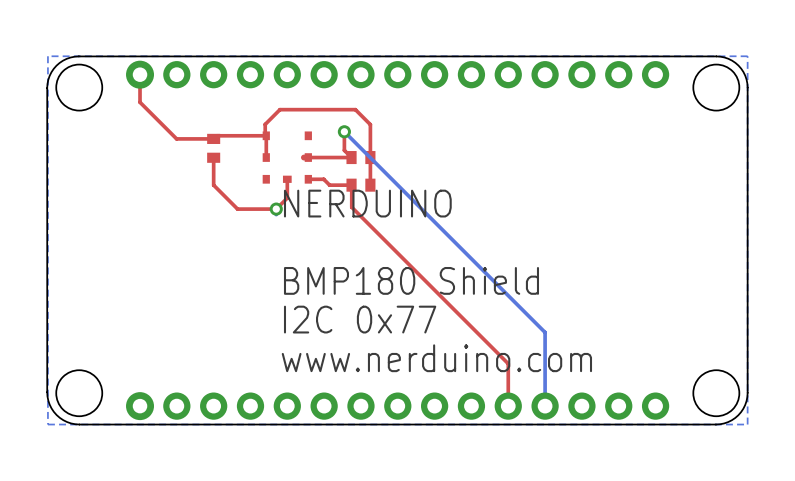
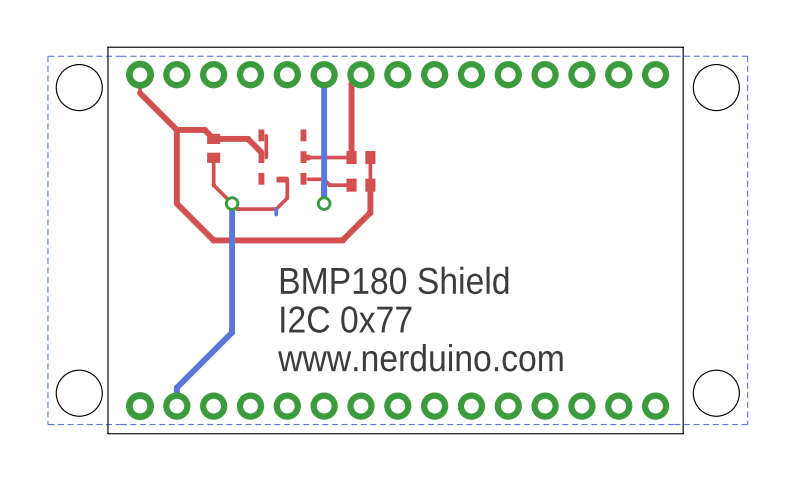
board edge: (716, 56) (78, 56) (63, 60) (51, 72) (47, 88) (47, 392) (51, 408) (63, 420) (79, 424) (715, 424) (731, 420) (743, 408) (747, 392) (747, 87) (745, 75) (738, 65) (728, 58) (716, 56) -> (683, 47) (683, 433) (107, 433) (107, 47) (683, 47)
bottom track: none -> (324, 74) (324, 203)
top track: (140, 93) (140, 102) (176, 138) (213, 138) (216, 135) (266, 135) (265, 124) (279, 109) (355, 109) (370, 124) (370, 157) -> (140, 93) (176, 129)
top track: none -> (176, 129) (204, 129) (213, 138) (247, 138) (261, 152)
top track: none -> (176, 129) (176, 203) (213, 240) (342, 240) (370, 212) (370, 185)
part footprint: [262, 131, 312, 184] -> [258, 129, 307, 185]
top track: (344, 131) (344, 150) (351, 157) -> (360, 74) (351, 84) (351, 157)
bottom track: (344, 131) (545, 332) (545, 406) -> none
via: (344, 131) -> none
top track: (351, 185) (349, 188) (351, 190) (351, 207) (508, 363) (508, 406) -> none
bottom track: none -> (232, 203) (232, 332) (176, 387) (176, 406)
via: none -> (232, 203)
via: none -> (324, 203)
text: NERDUINO (367, 203) -> none
via: (276, 209) -> none

